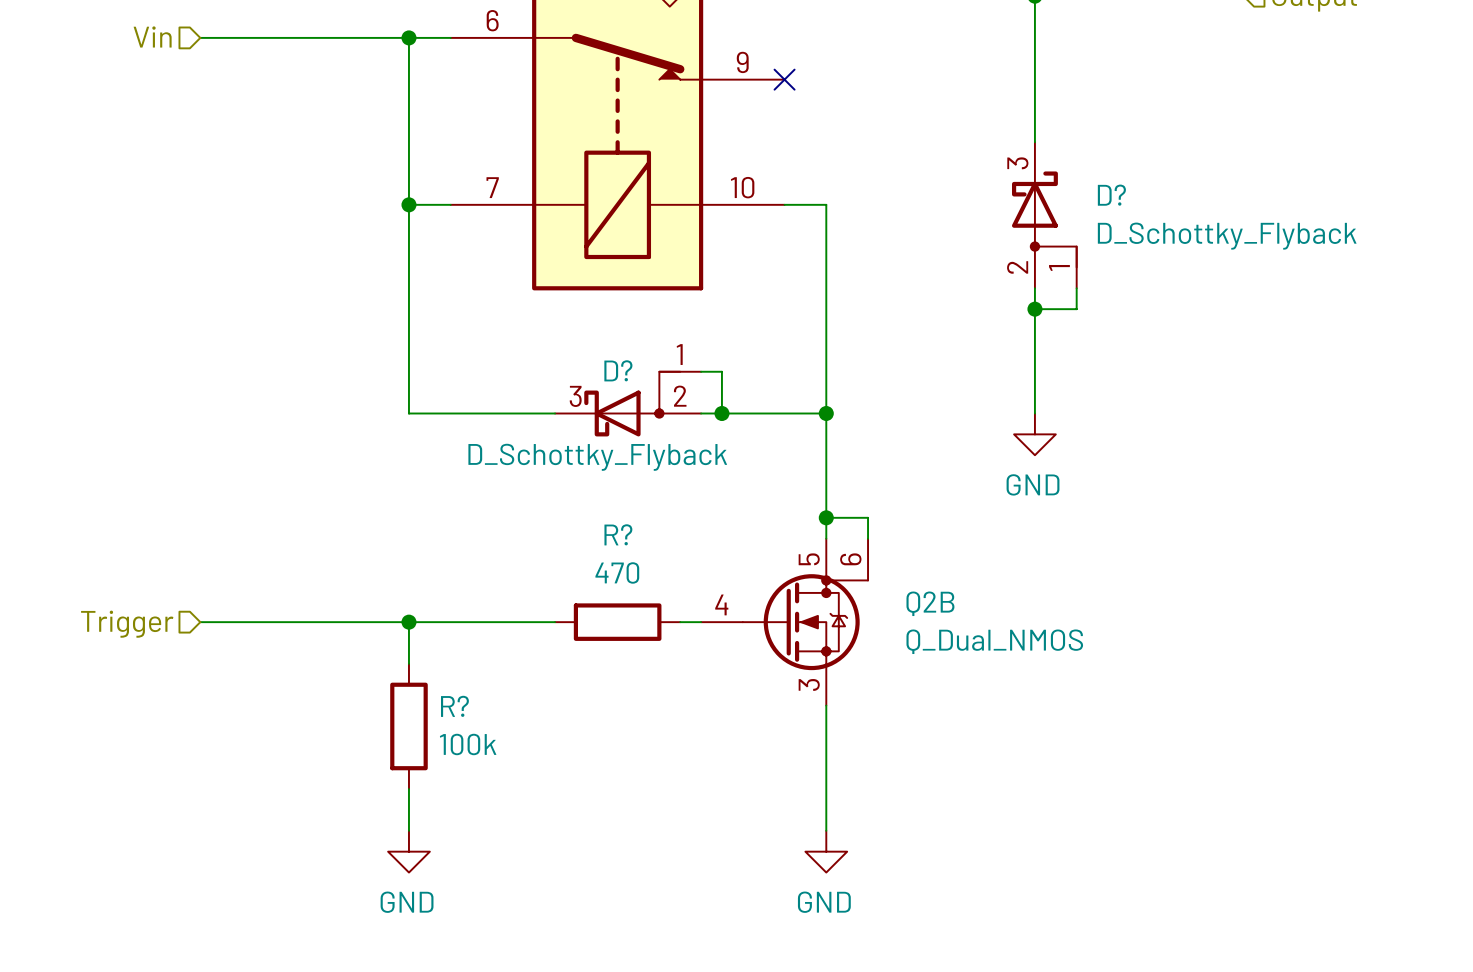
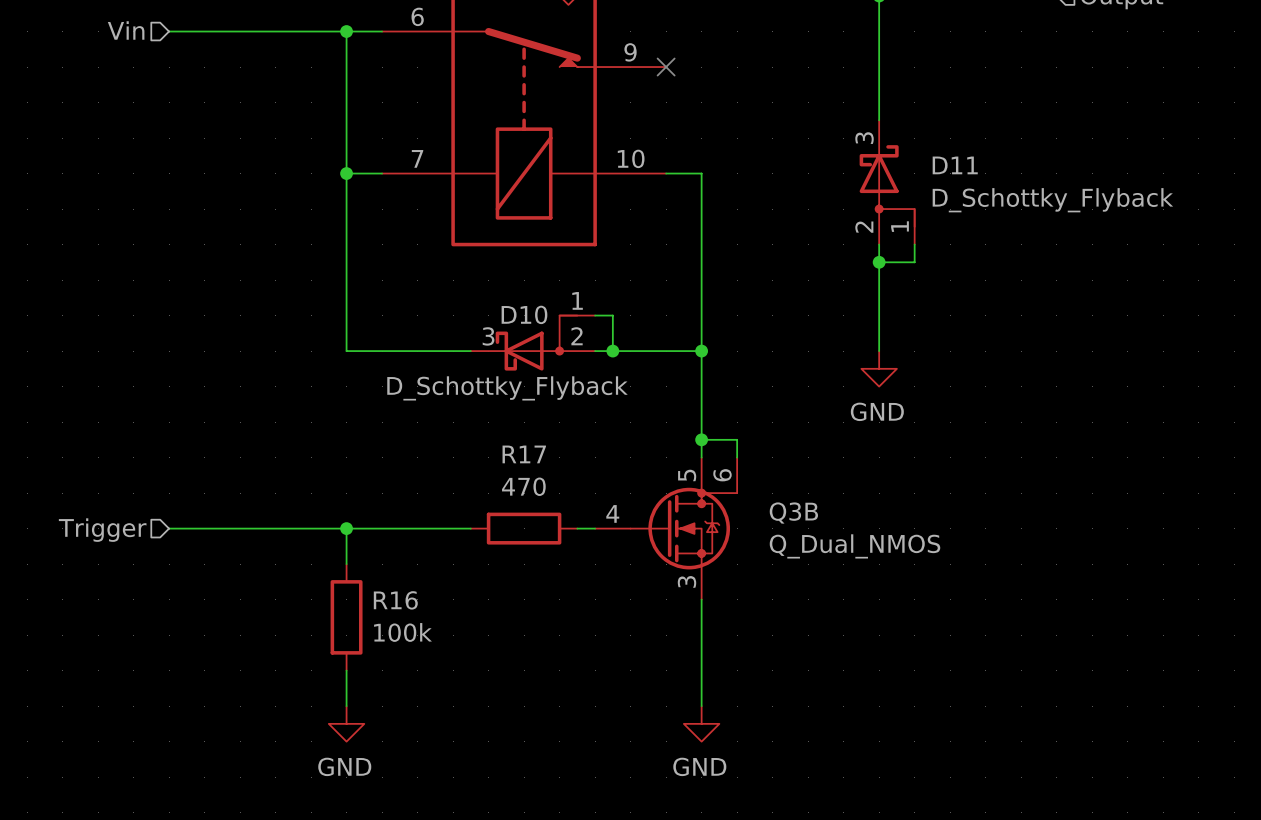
D? name: D? (1111, 195) -> D11 (955, 165)
D? name: D? (618, 370) -> D10 (524, 314)
R? name: R? (618, 534) -> R17 (524, 454)
Q2B name: Q2B (930, 603) -> Q3B (793, 513)
R? name: R? (454, 706) -> R16 (395, 600)

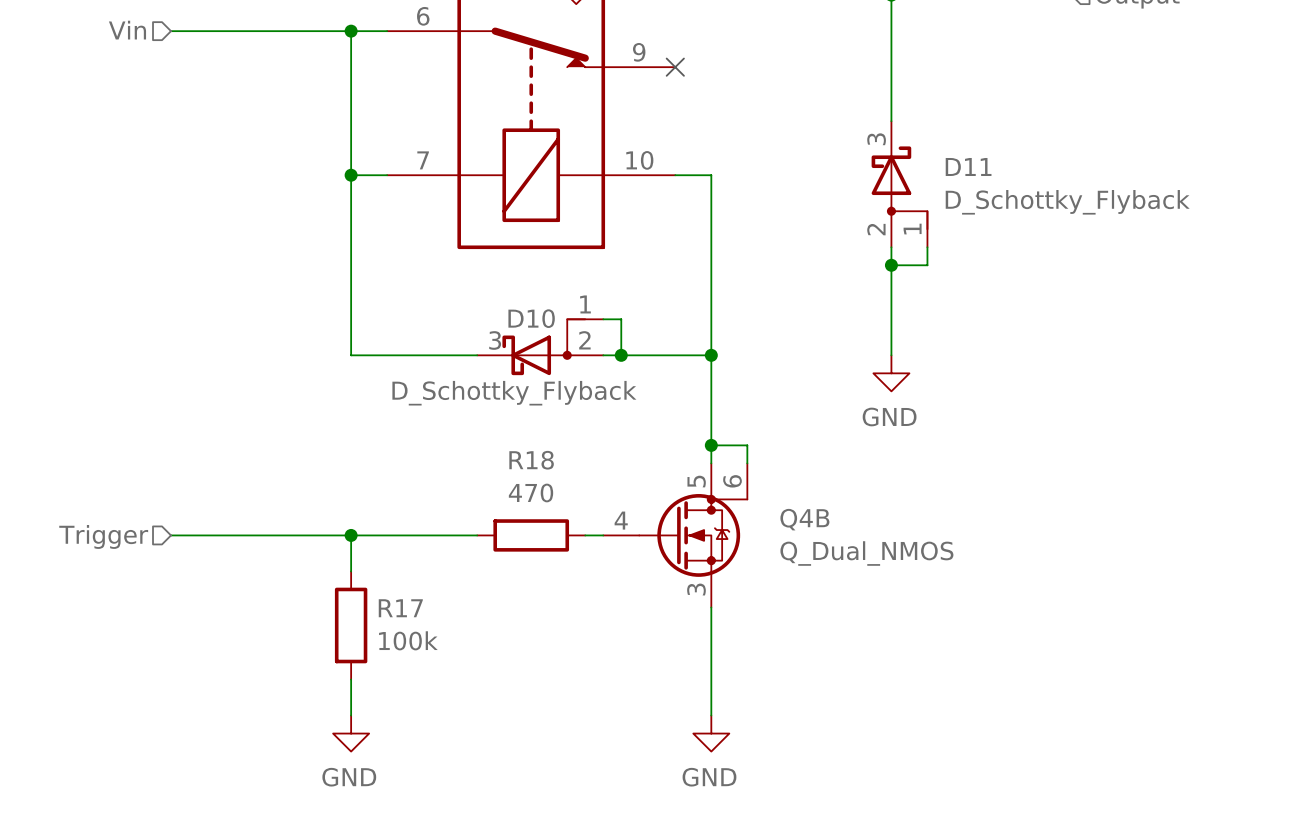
R17 name: R17 (524, 454) -> R18 (531, 460)
Q3B name: Q3B (793, 513) -> Q4B (804, 519)
R16 name: R16 (395, 600) -> R17 (400, 608)

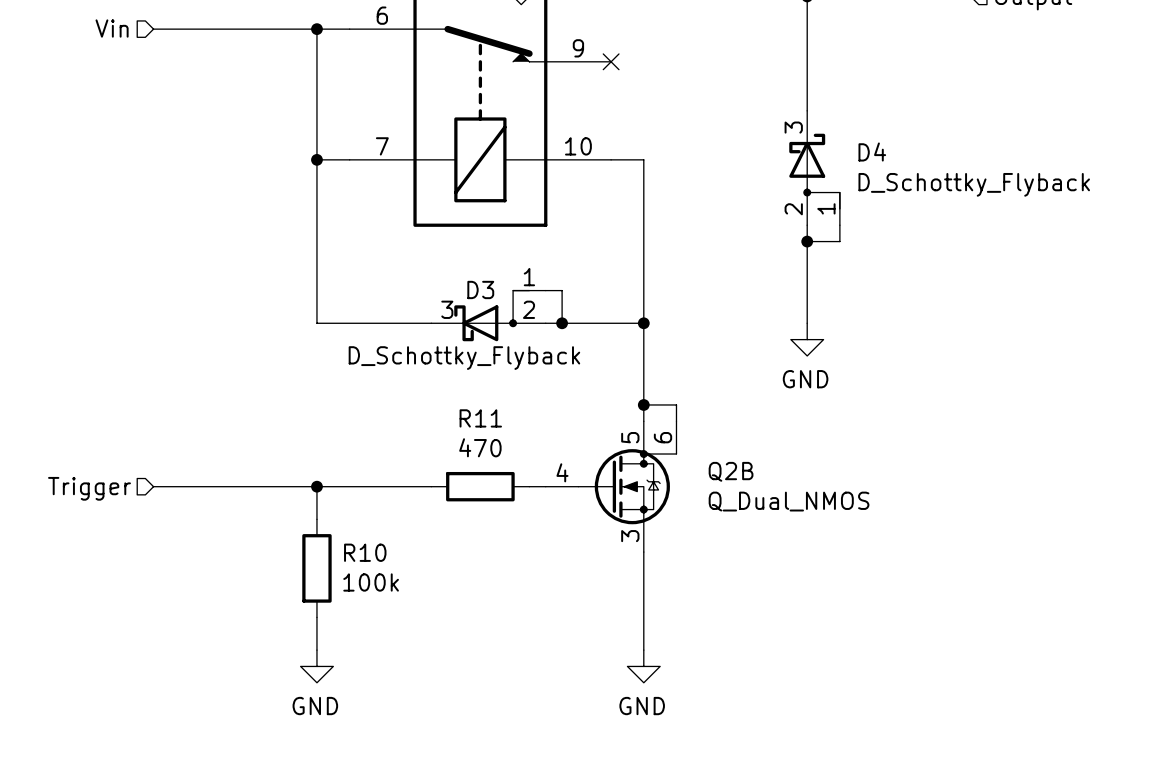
D11 name: D11 (968, 166) -> D4 (872, 152)
D10 name: D10 (531, 318) -> D3 (480, 289)
R18 name: R18 (531, 460) -> R11 (480, 418)
Q4B name: Q4B (804, 519) -> Q2B (731, 471)
R17 name: R17 (400, 608) -> R10 (365, 552)

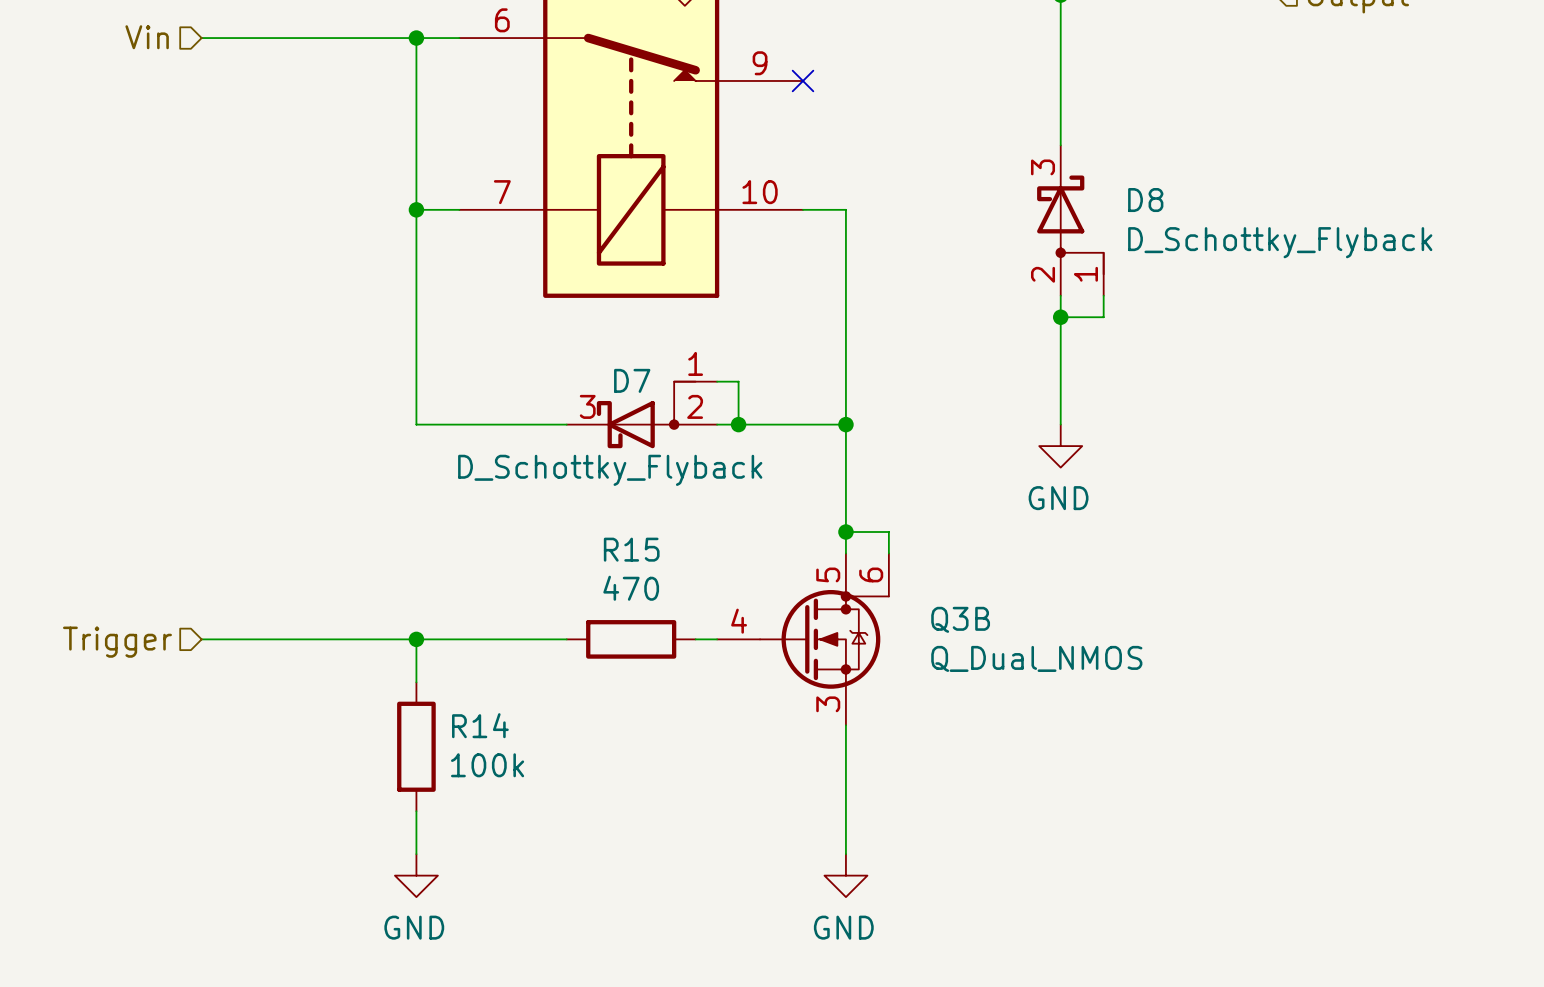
D4 name: D4 (872, 152) -> D8 (1145, 200)
D3 name: D3 (480, 289) -> D7 (632, 380)
R11 name: R11 (480, 418) -> R15 (631, 549)
Q2B name: Q2B (731, 471) -> Q3B (960, 619)
R10 name: R10 (365, 552) -> R14 (480, 725)

